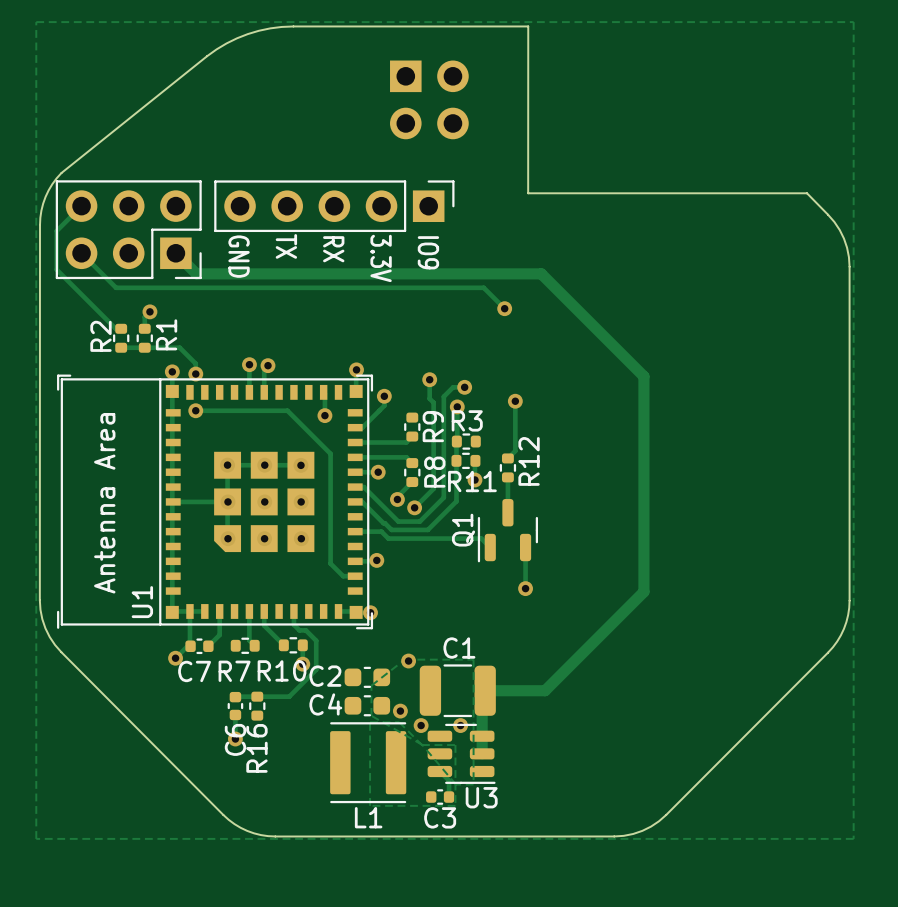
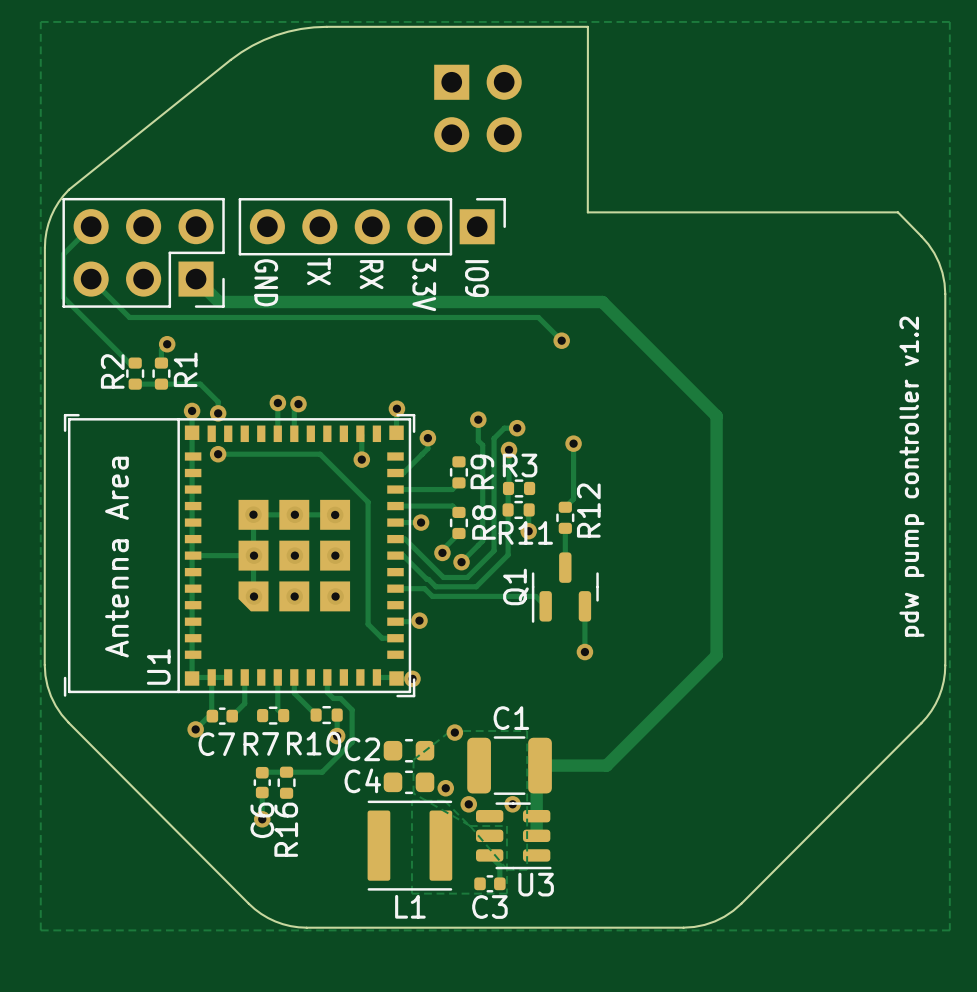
text: none -> pdw pump controller v1.2 (911, 476)

